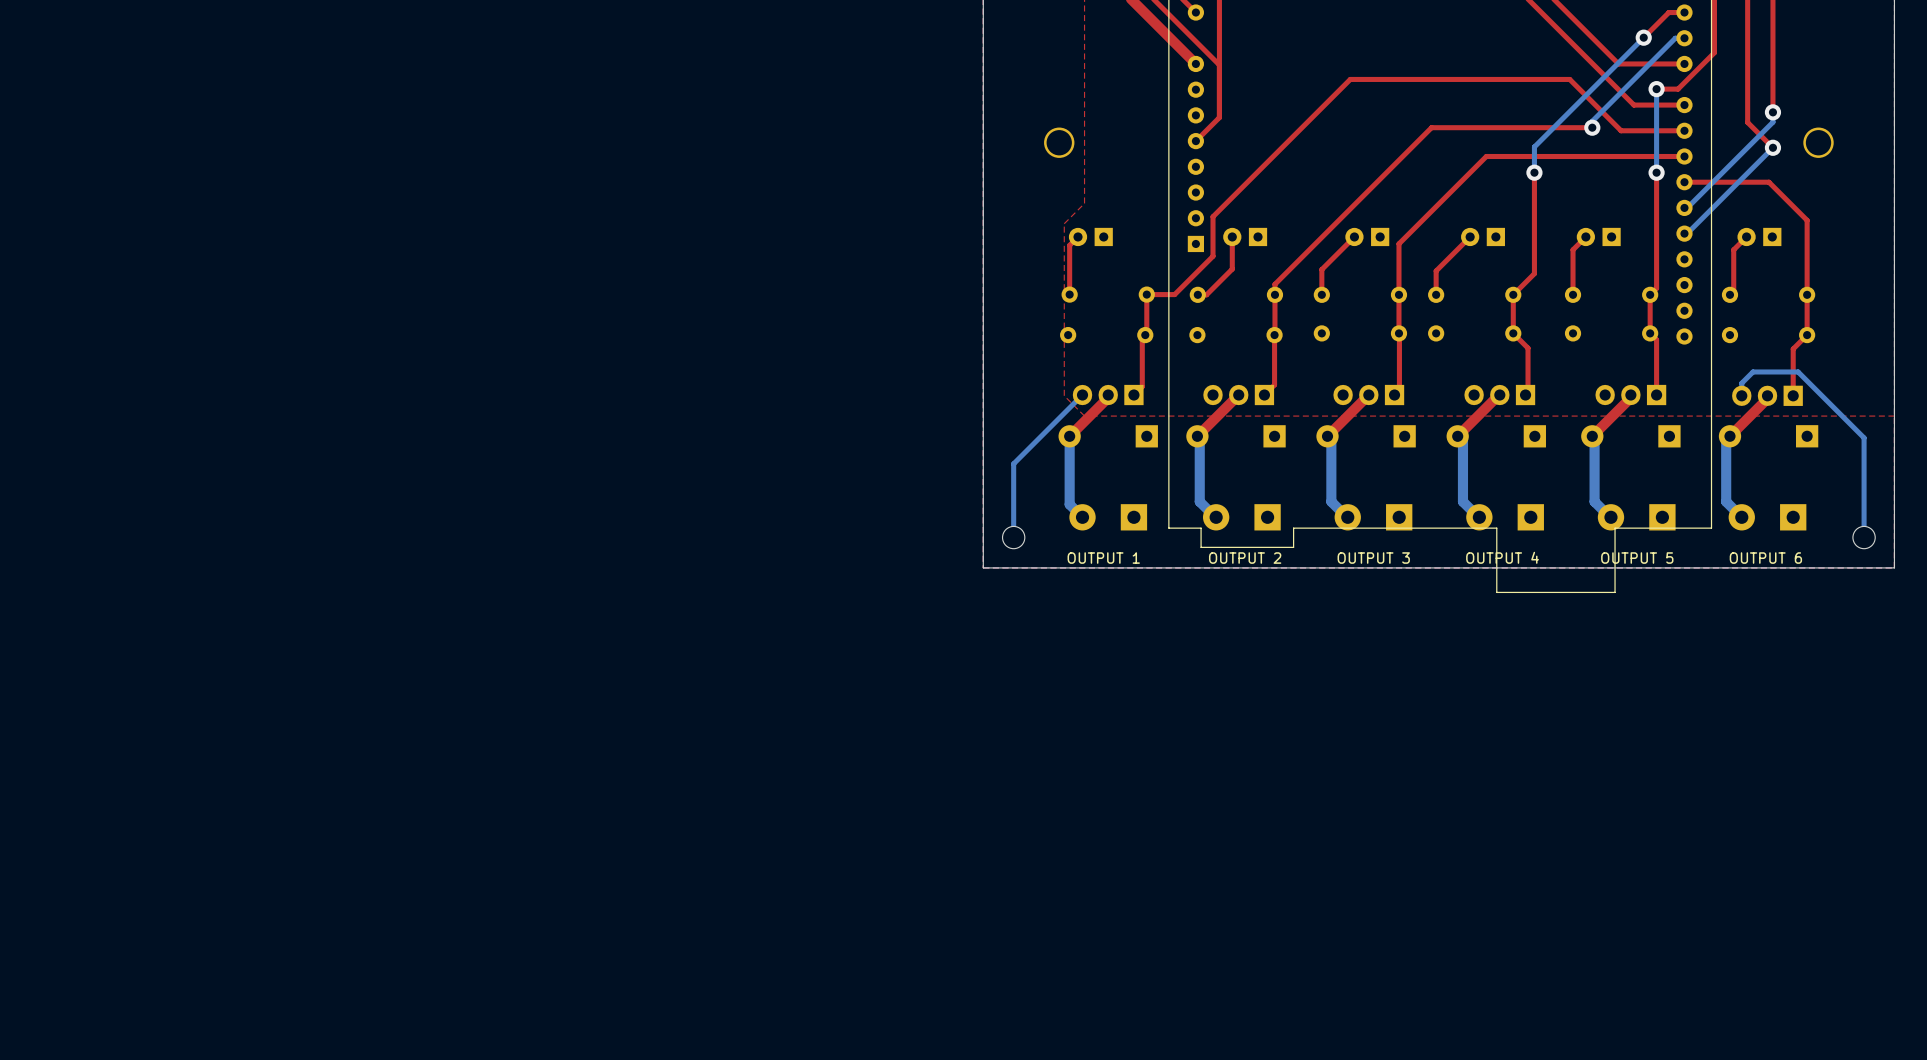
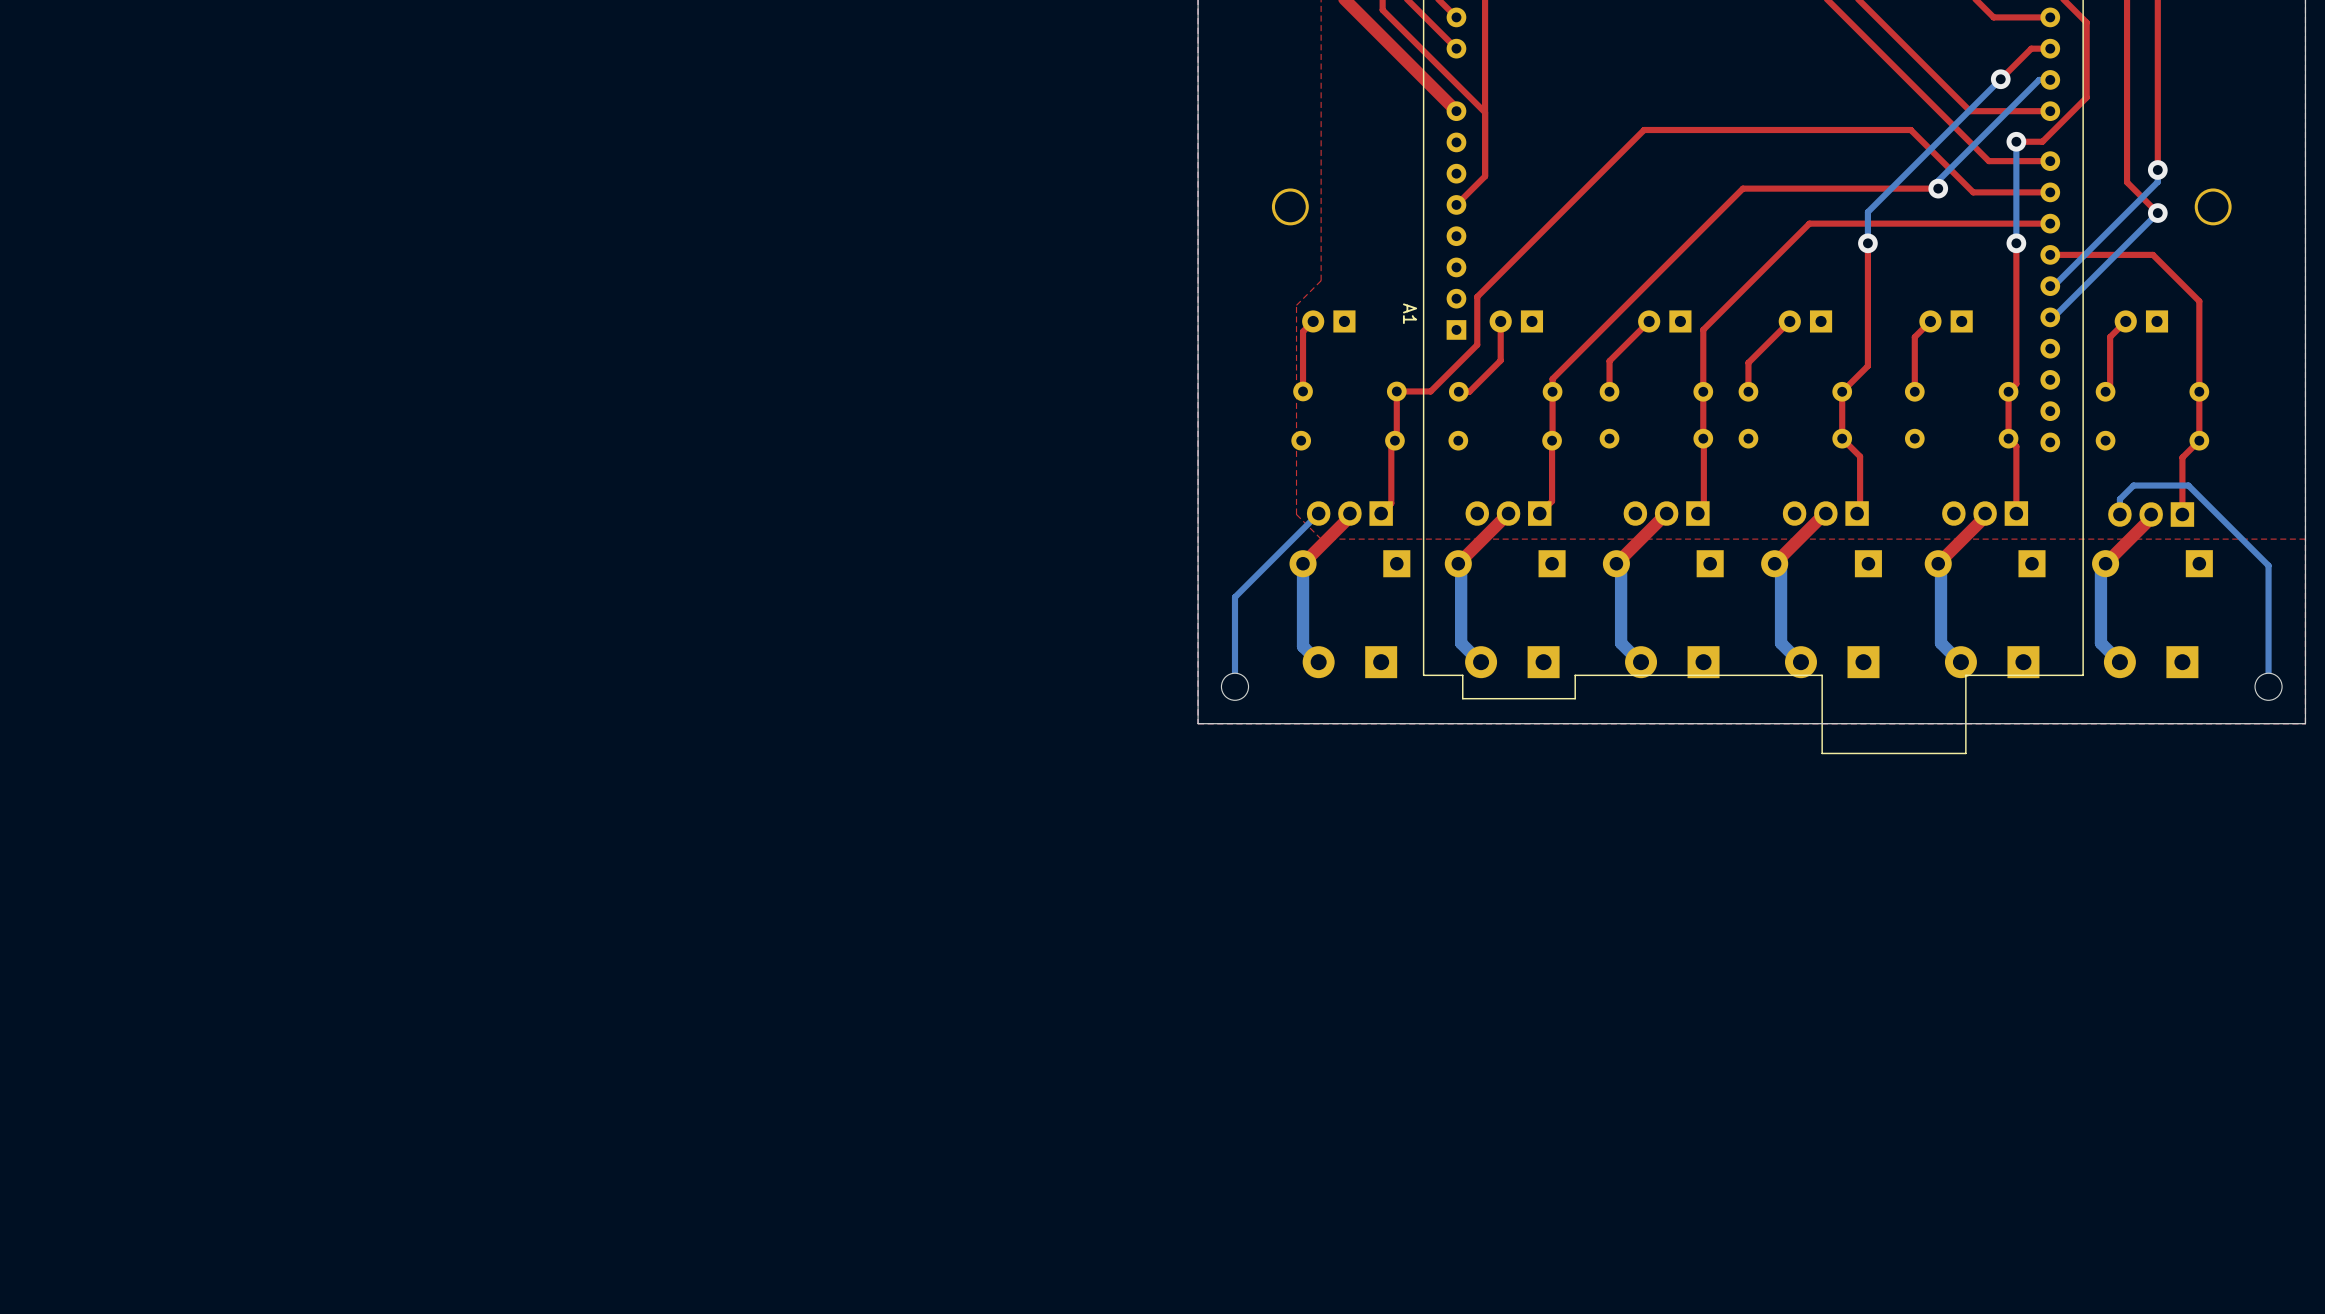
A1 name: none -> A1 (1410, 313)
text: OUTPUT 4 (1502, 557) -> none
text: OUTPUT 1 (1103, 558) -> none
text: OUTPUT 2 (1245, 558) -> none
text: OUTPUT 3 (1373, 558) -> none
text: OUTPUT 5 (1637, 558) -> none
text: OUTPUT 6 (1765, 558) -> none

